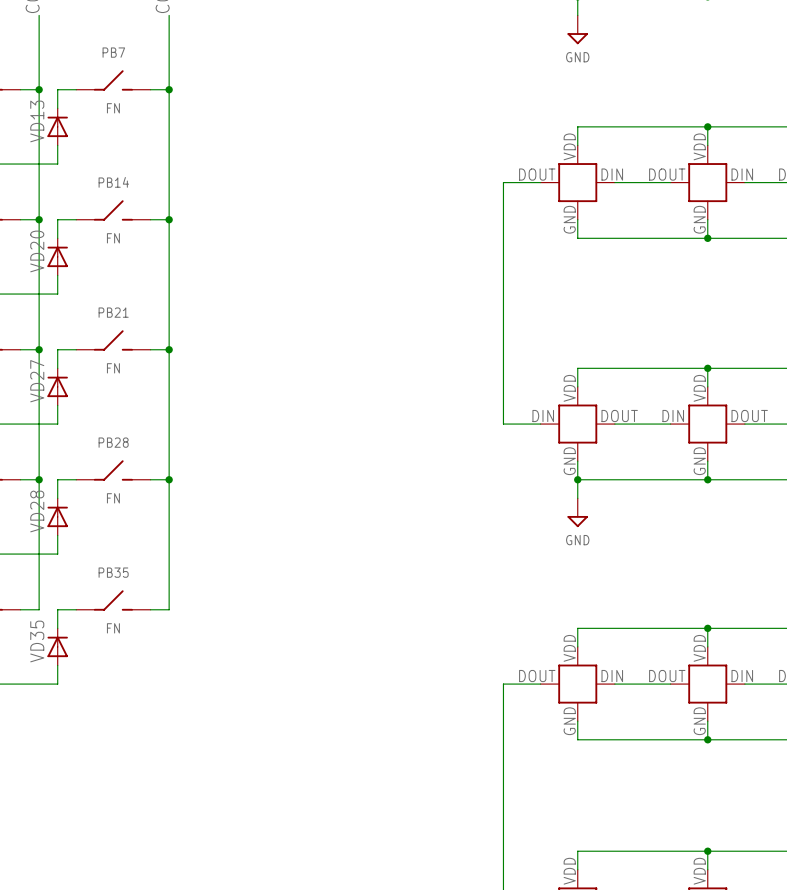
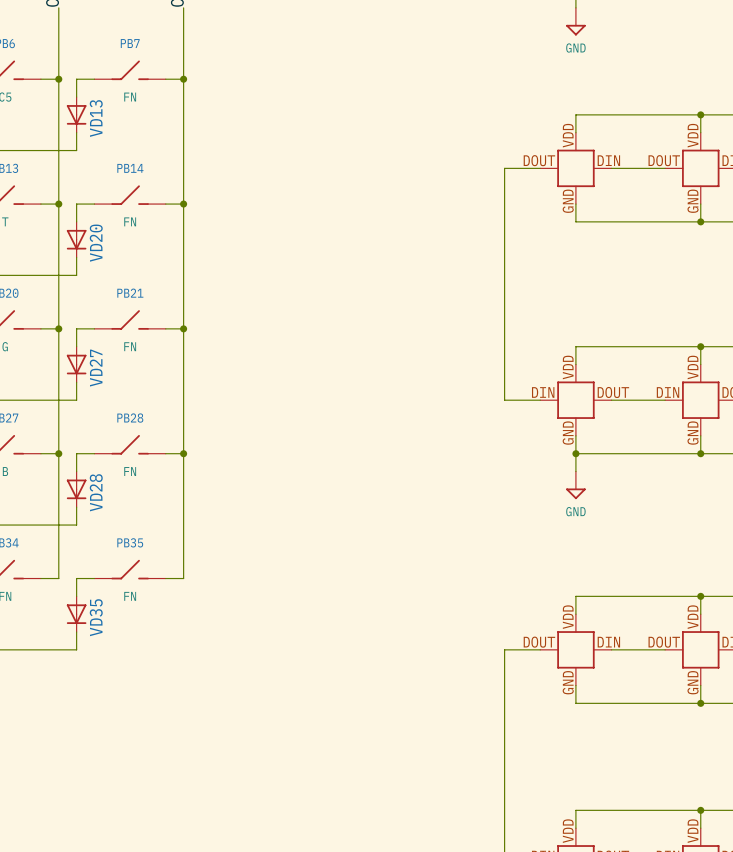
VD13 rotation: 0° (57, 126) -> 180° (76, 114)
VD20 rotation: 0° (57, 256) -> 180° (76, 239)
VD27 rotation: 0° (57, 386) -> 180° (76, 364)
VD28 rotation: 0° (57, 516) -> 180° (76, 489)
VD35 rotation: 0° (57, 646) -> 180° (76, 614)

